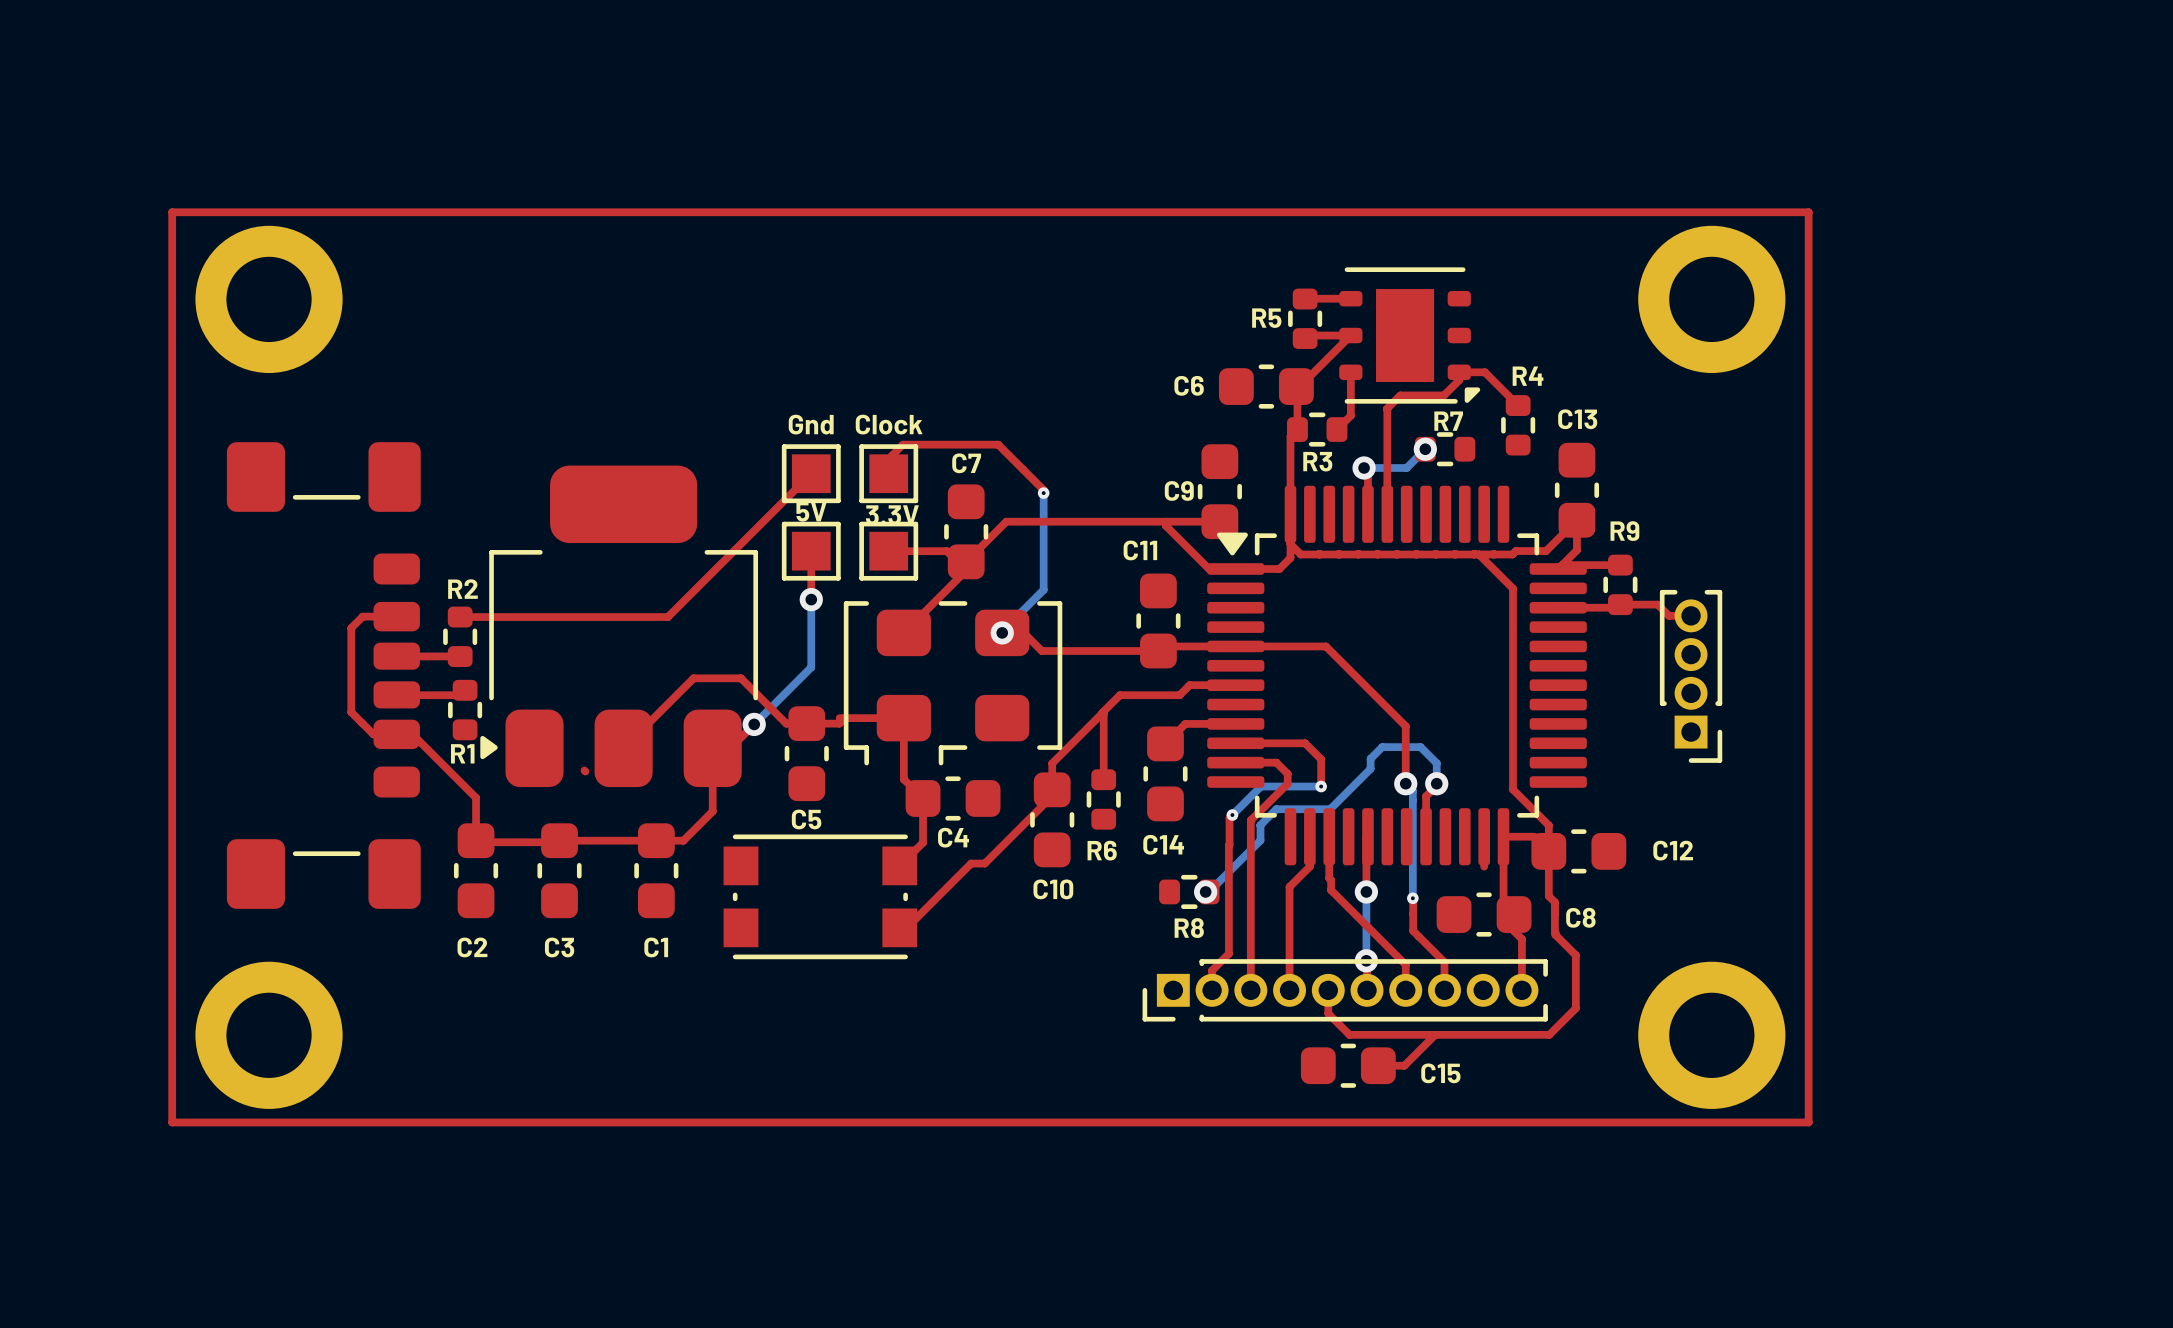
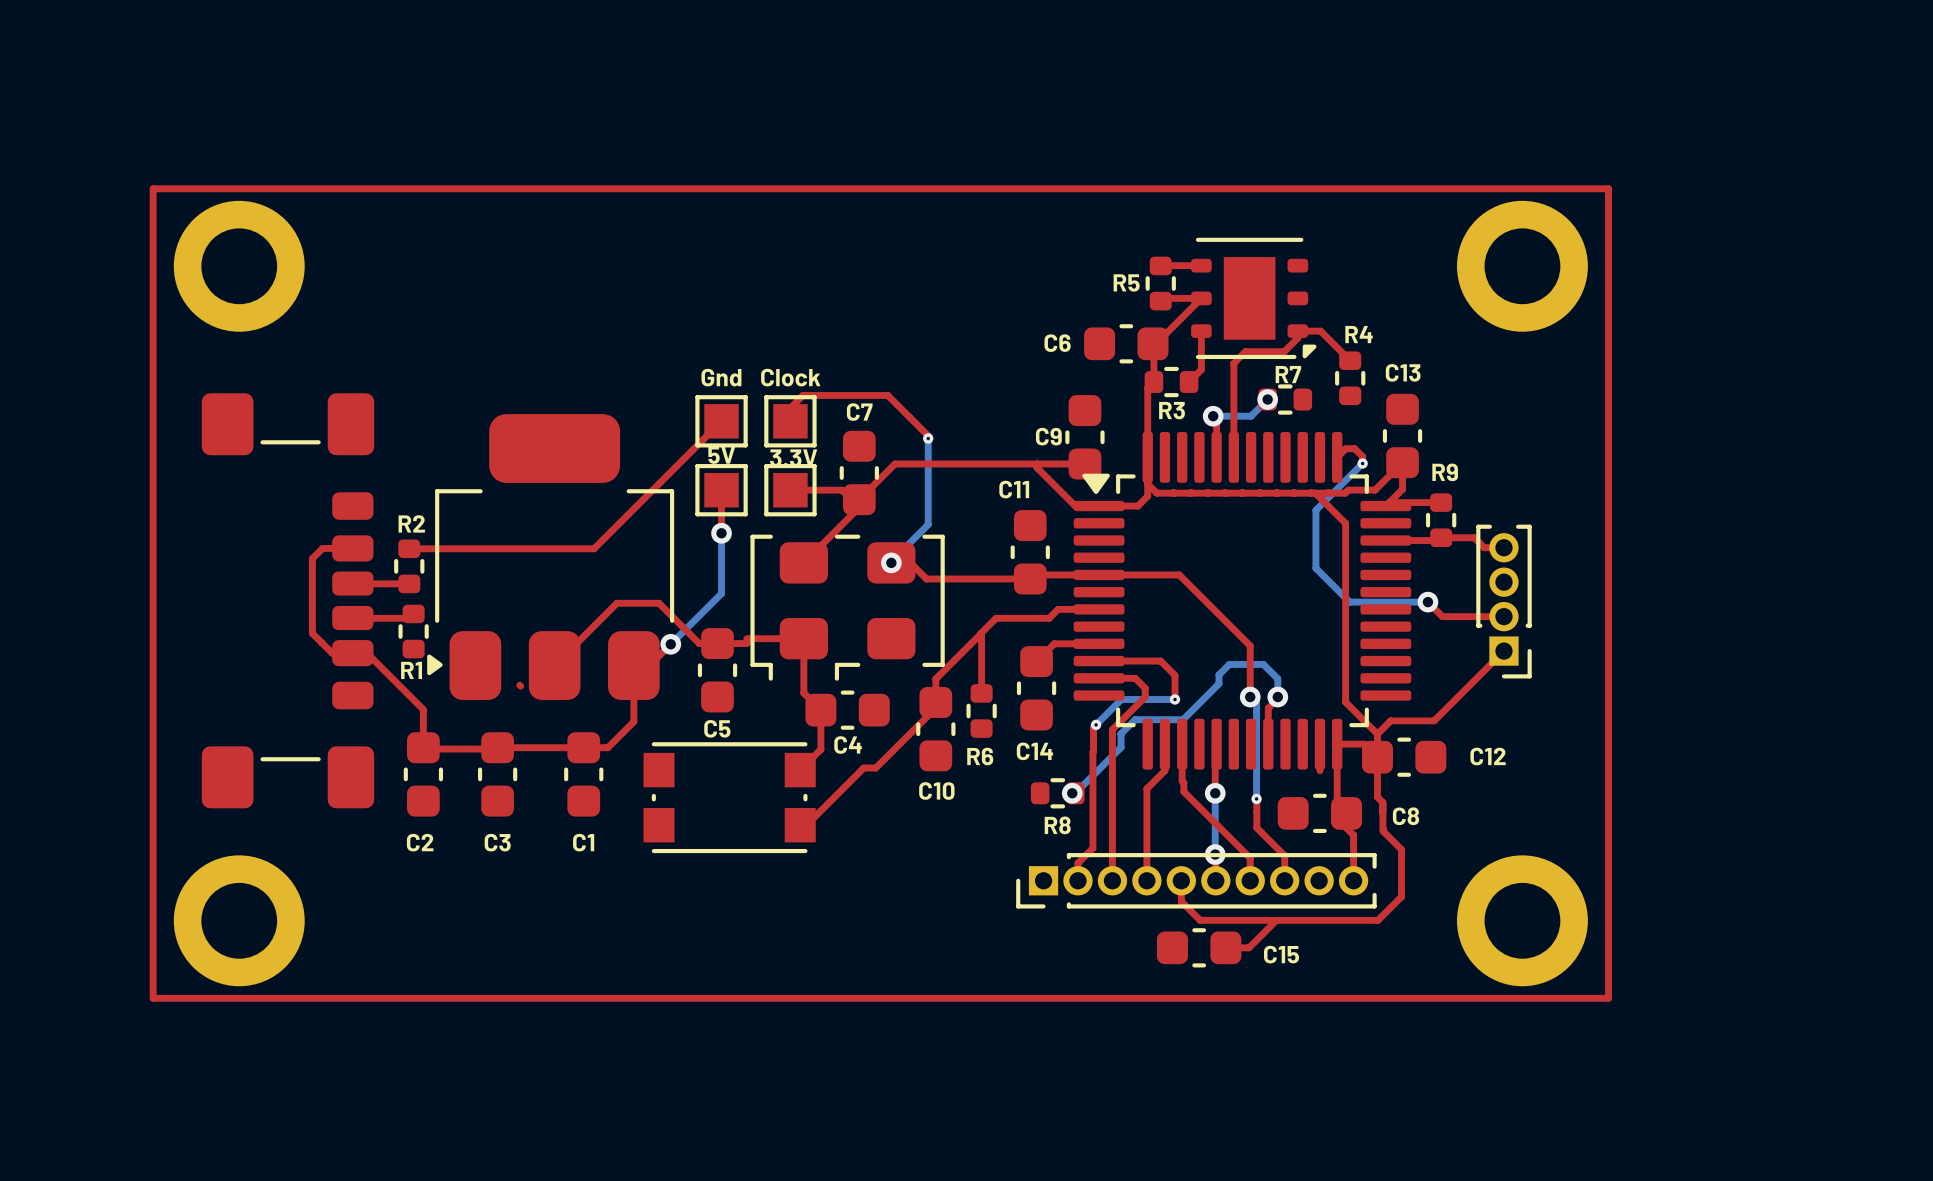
top track: none -> (1337, 457) (1345, 448) (1354, 448) (1362, 456) (1362, 463)
bottom track: none -> (1362, 463) (1315, 510) (1315, 568) (1349, 602) (1427, 602)
via: none -> (1362, 463)
top track: none -> (1427, 602) (1442, 616) (1503, 616)
via: none -> (1427, 602)
top track: none -> (1503, 651) (1434, 720) (1390, 720) (1377, 734)

